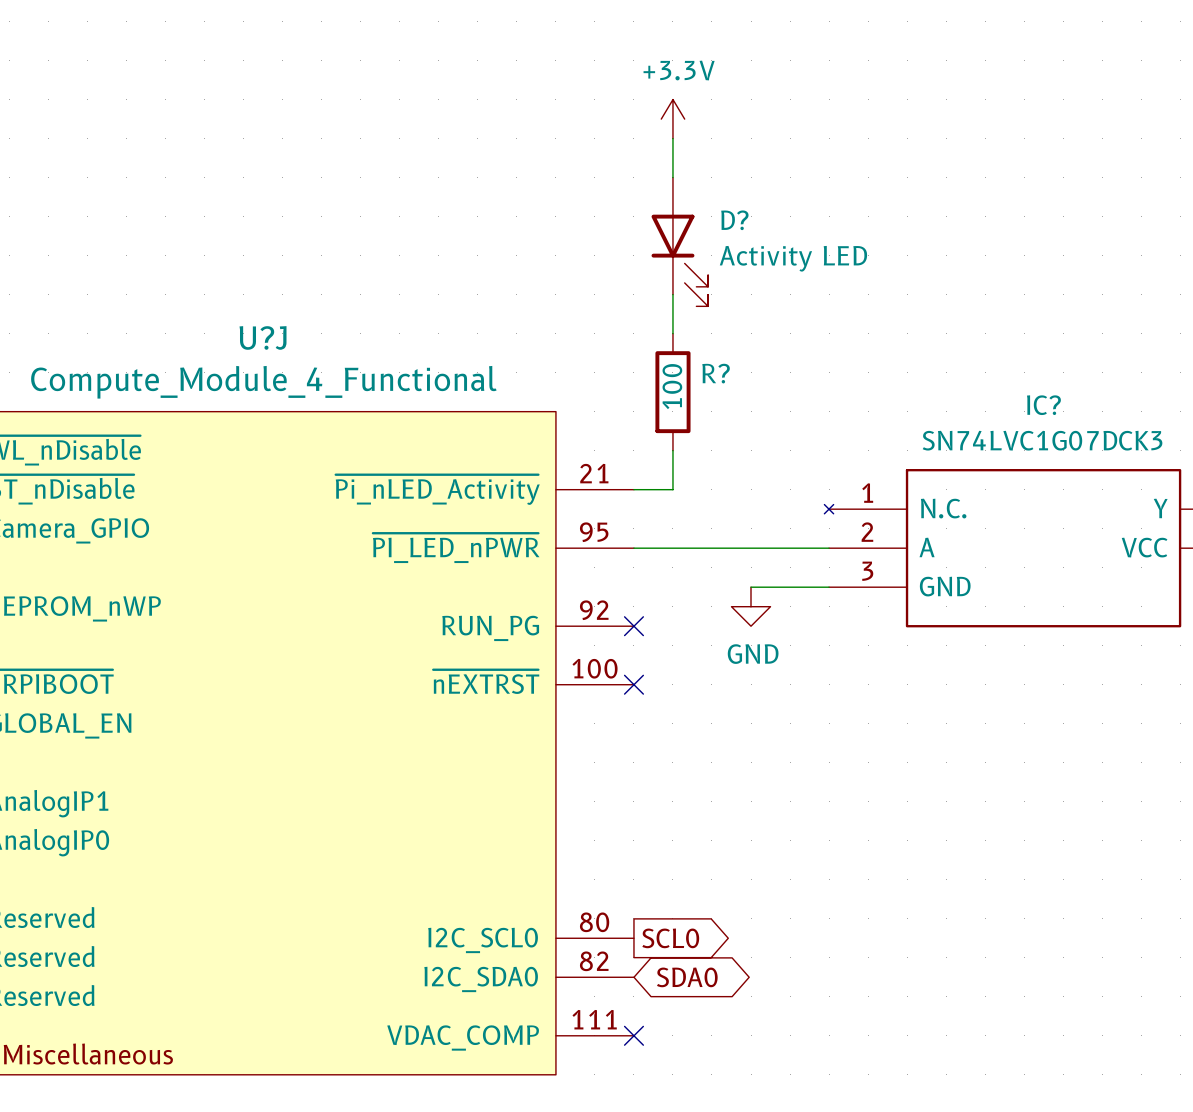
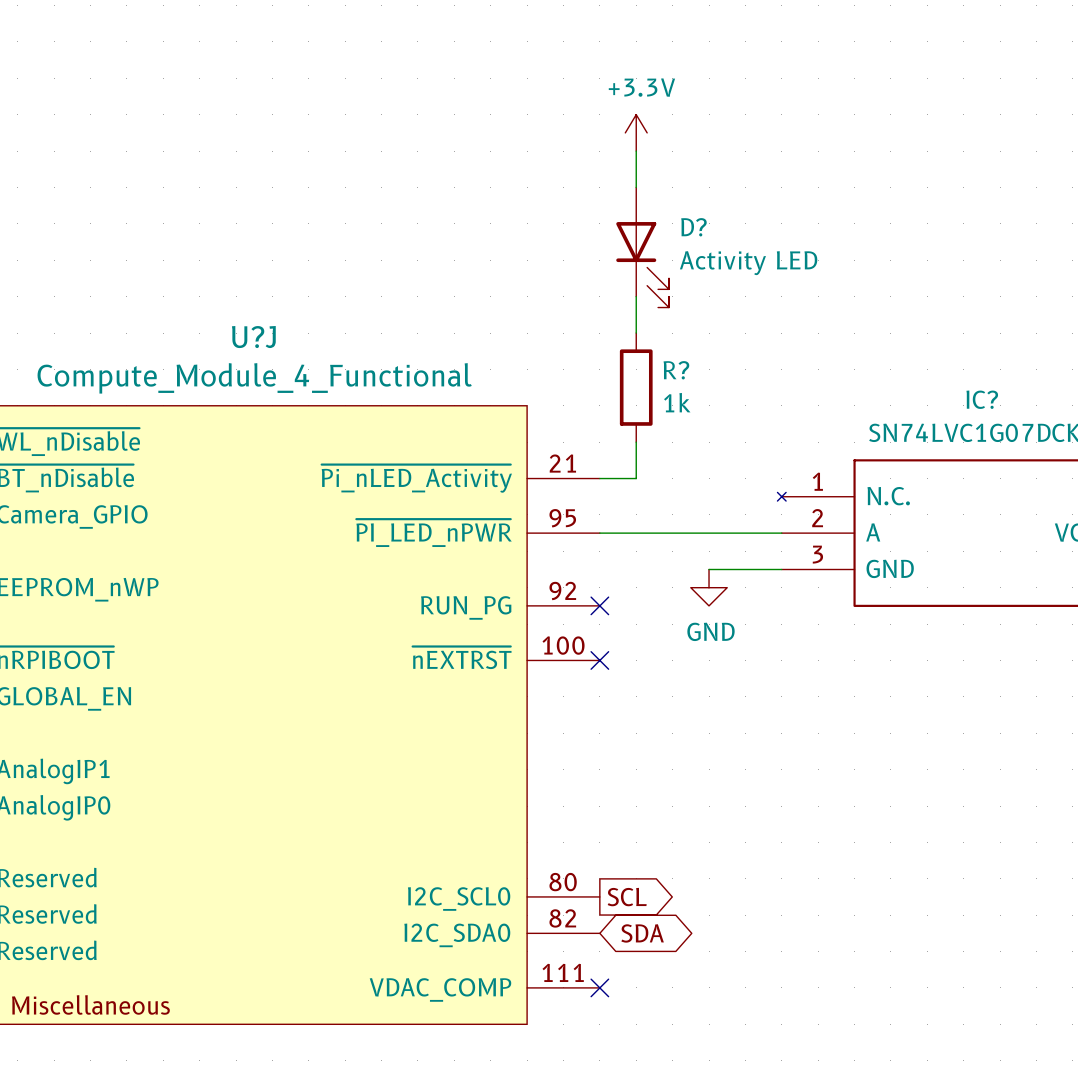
R? value: 100 (672, 386) -> 1k (677, 402)
global label: SCL0 (670, 938) -> SCL (627, 897)
global label: SDA0 (687, 977) -> SDA (642, 933)

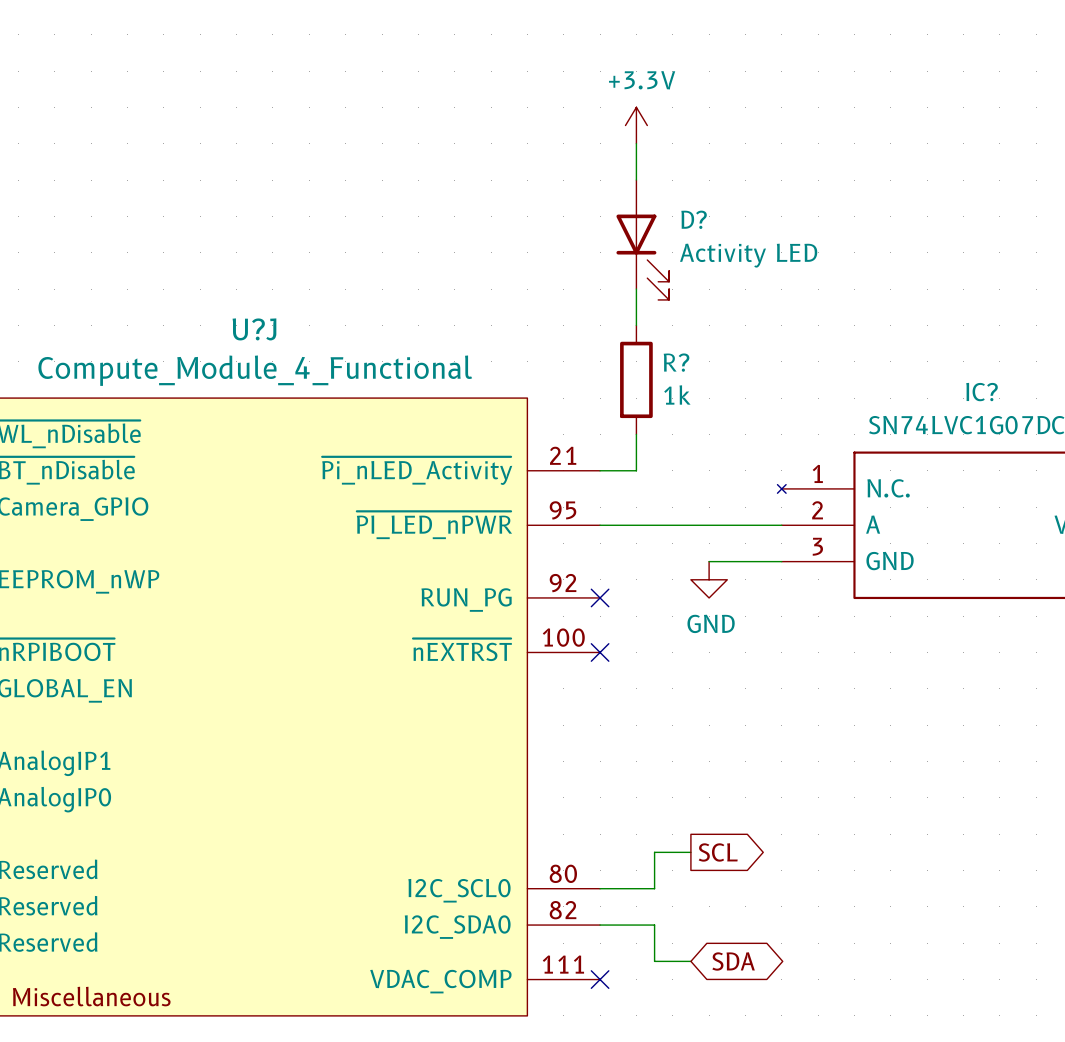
wire: none -> (690, 852) (654, 852) (654, 888) (600, 888)
global label position: SCL (627, 897) -> SCL (718, 852)
wire: none -> (600, 925) (654, 925) (654, 961) (690, 961)
global label position: SDA (642, 933) -> SDA (733, 961)

